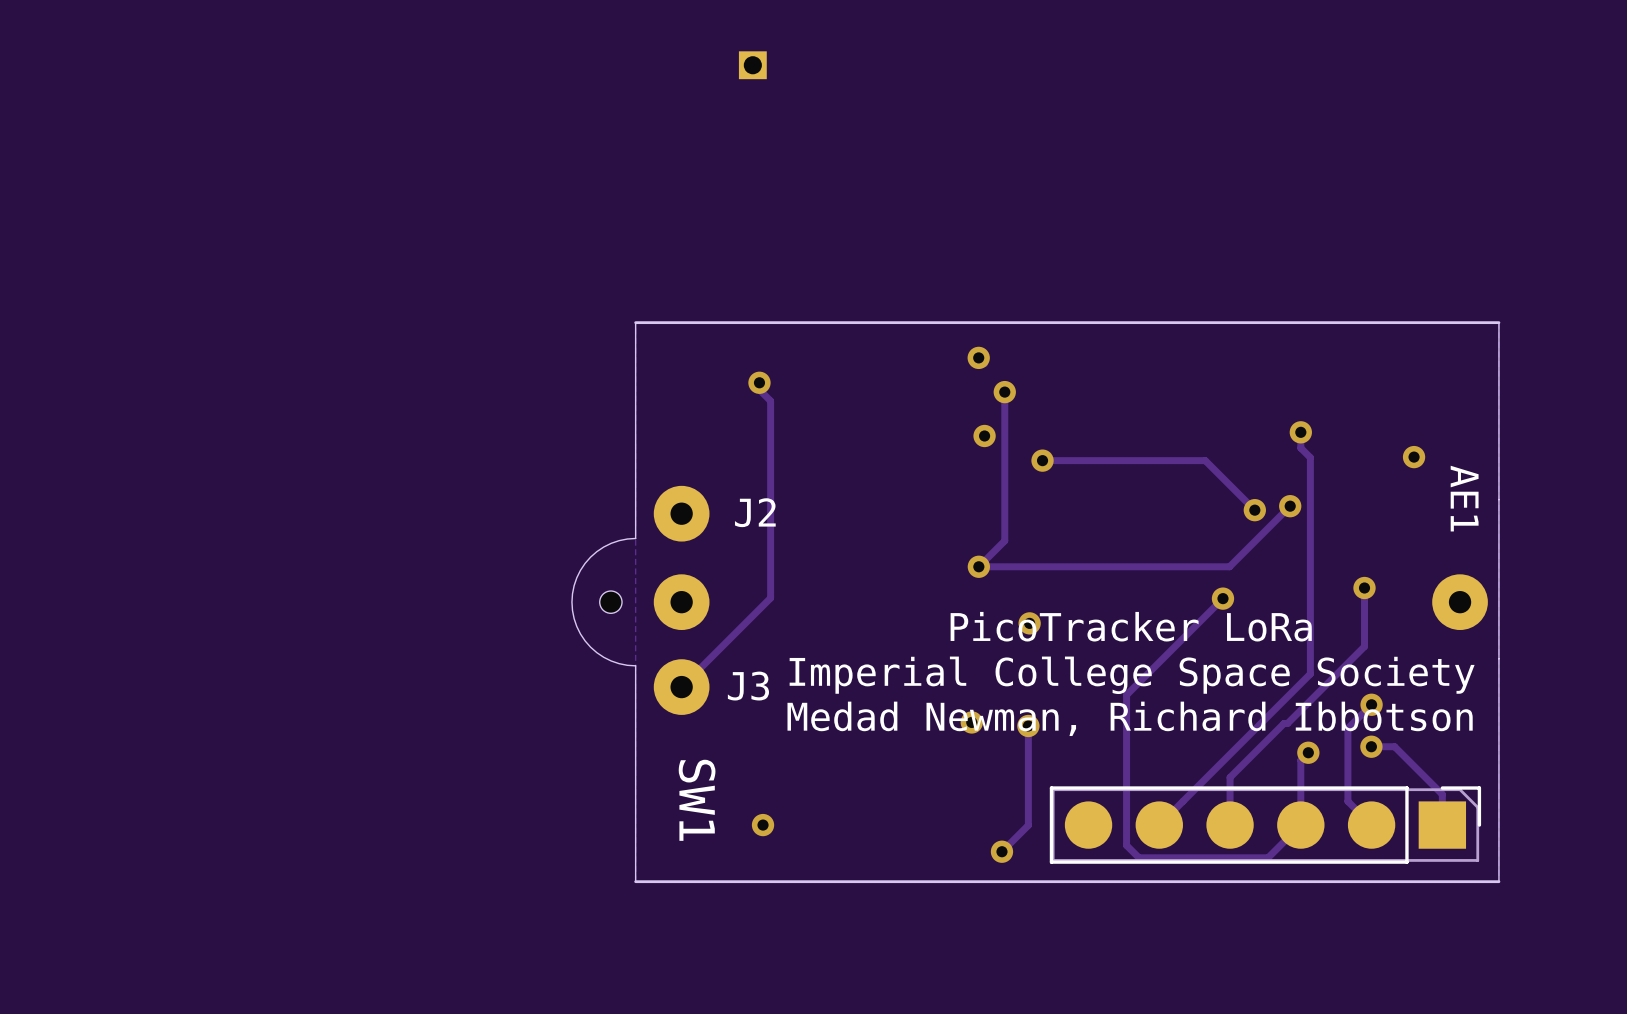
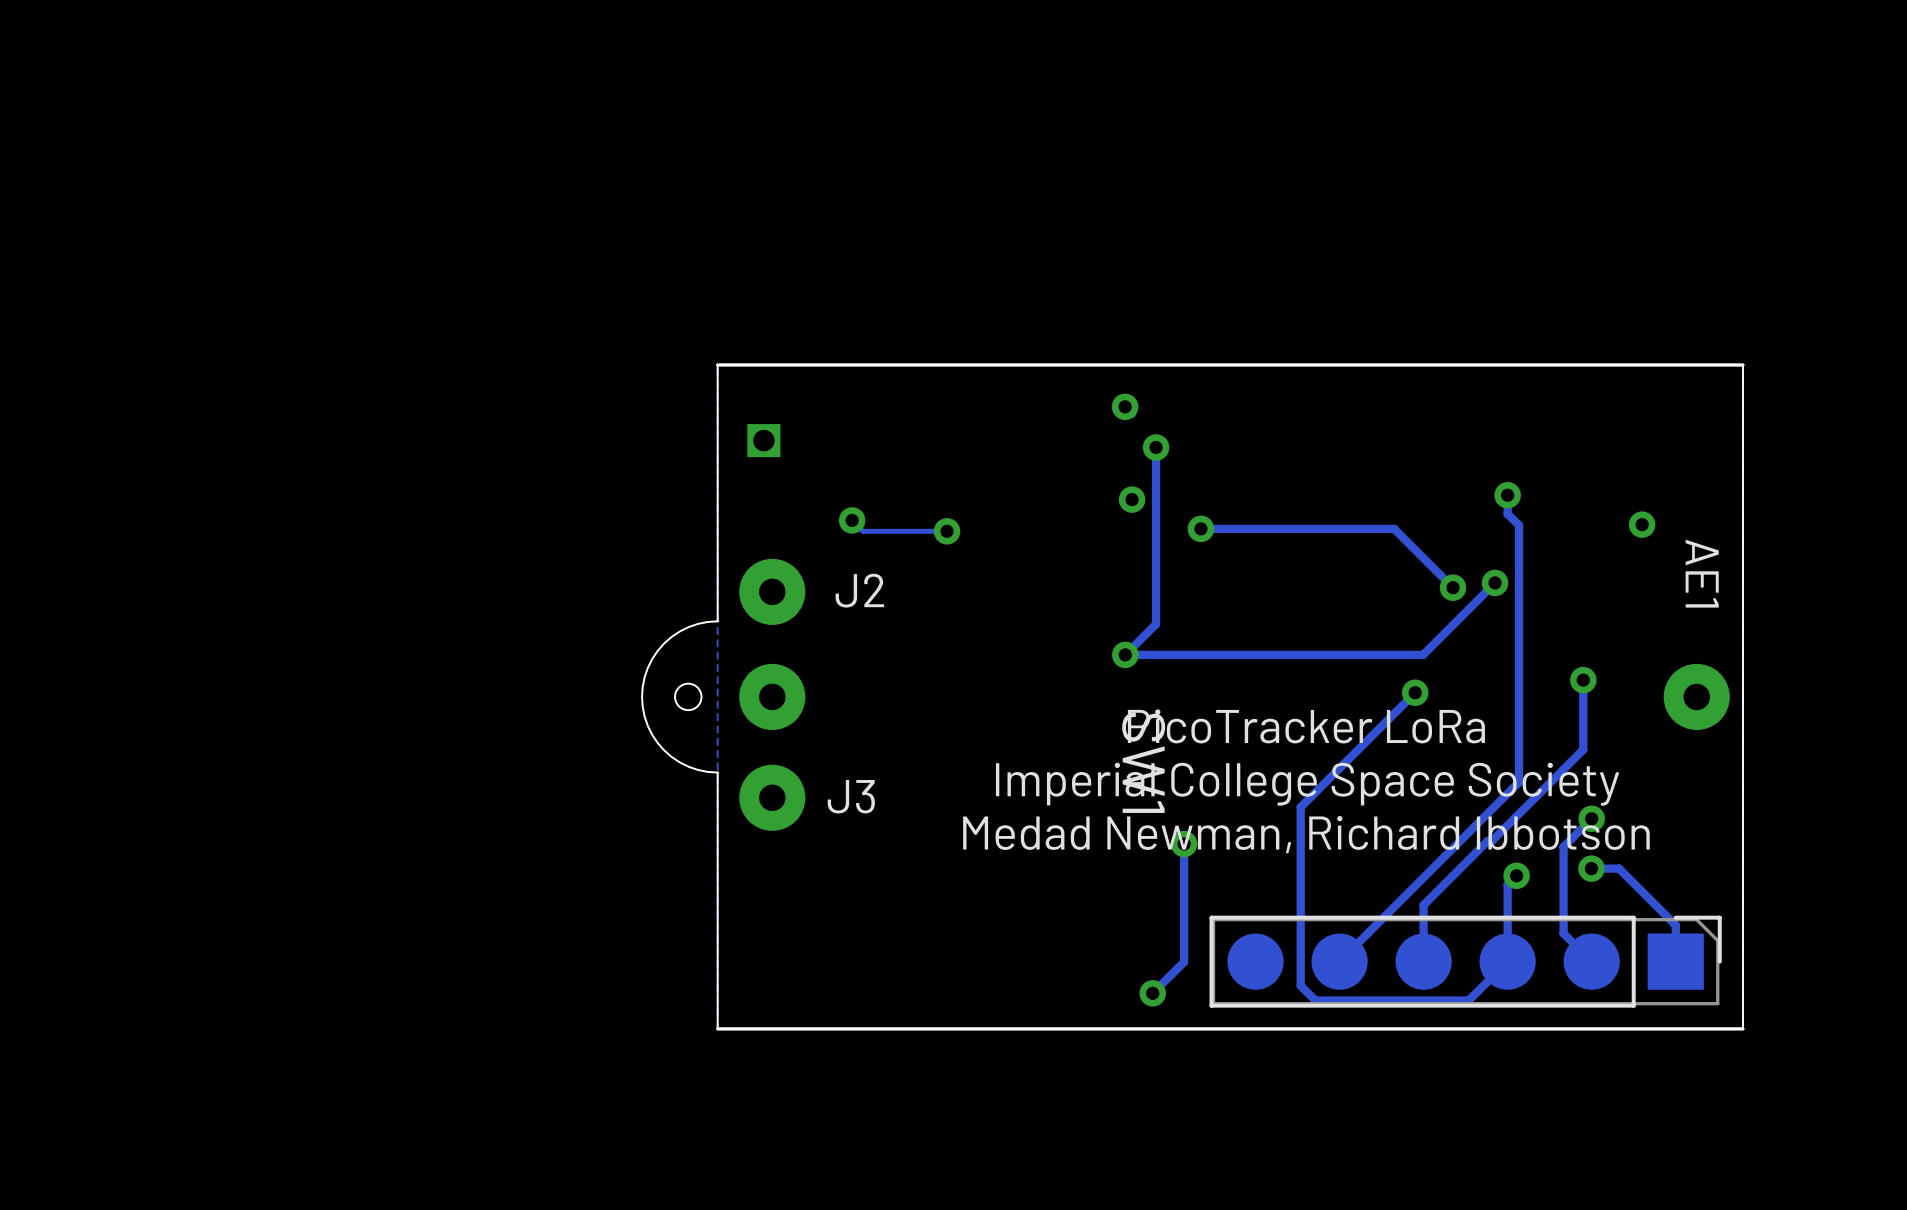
part position: (752, 65) -> (763, 440)
via: (759, 382) -> none
track: (759, 389) (770, 401) (770, 598) (681, 687) -> none
track: none -> (852, 520) (863, 531) (947, 531)
via: none -> (852, 520)
via: none -> (947, 531)
via: (1029, 623) -> none
via: (971, 722) -> none
SW1 position: (697, 800) -> (1143, 762)
via: (763, 825) -> none

